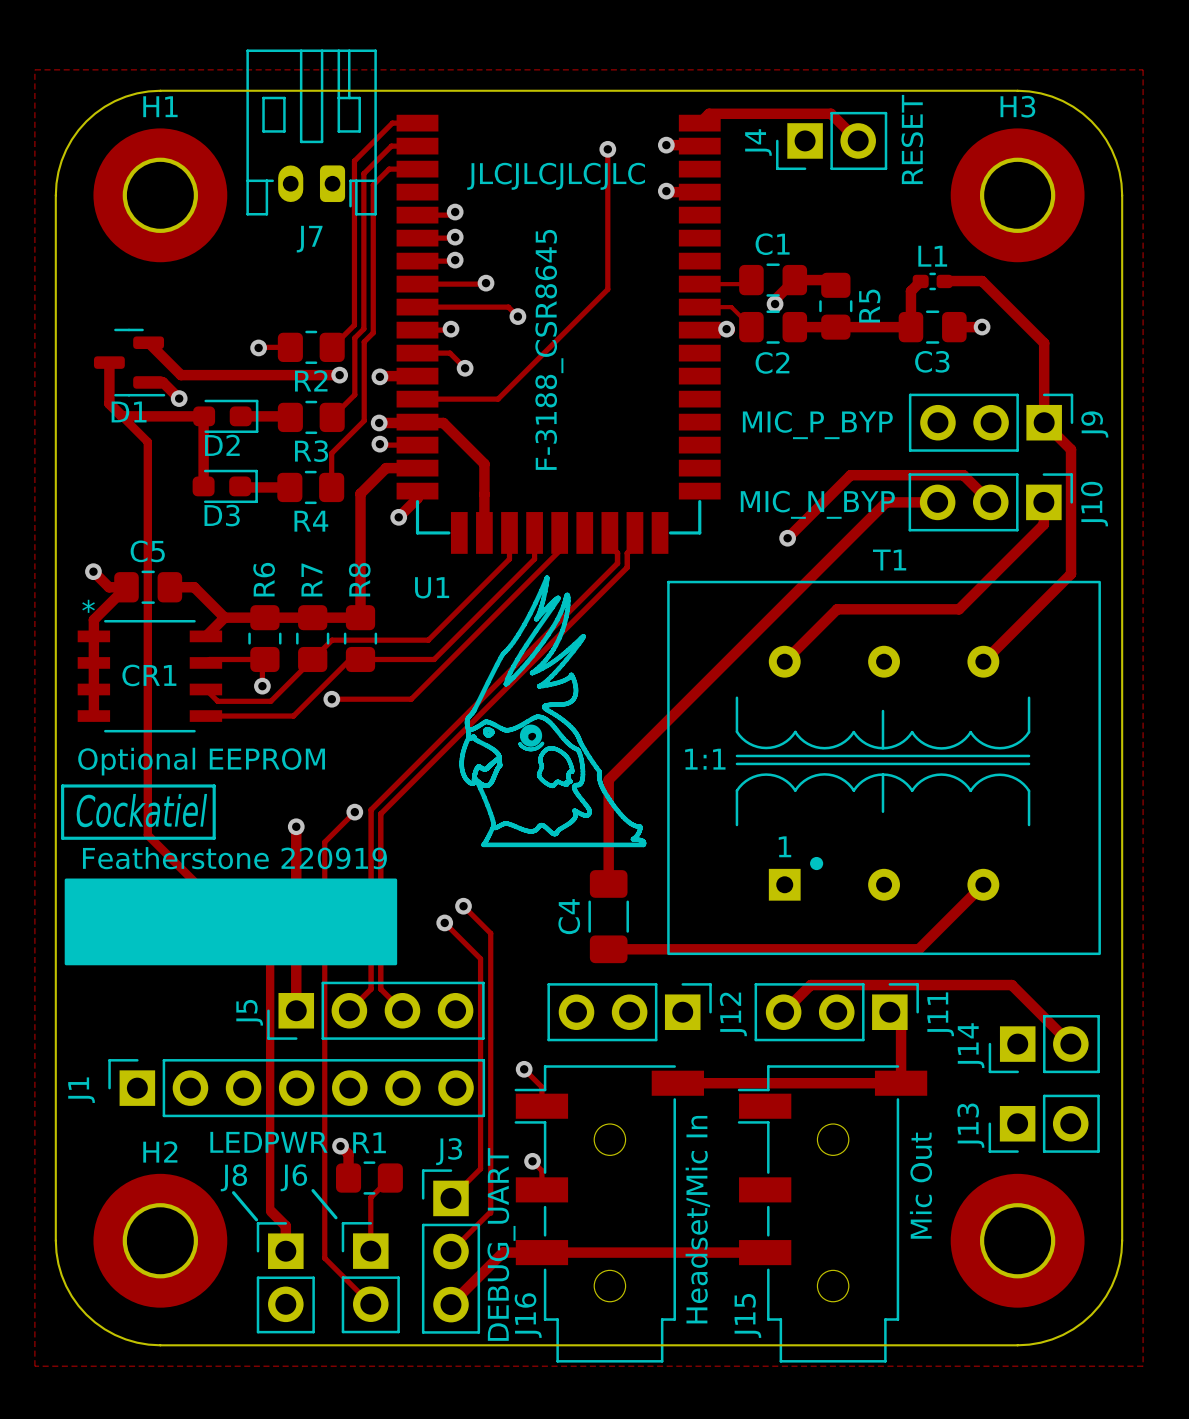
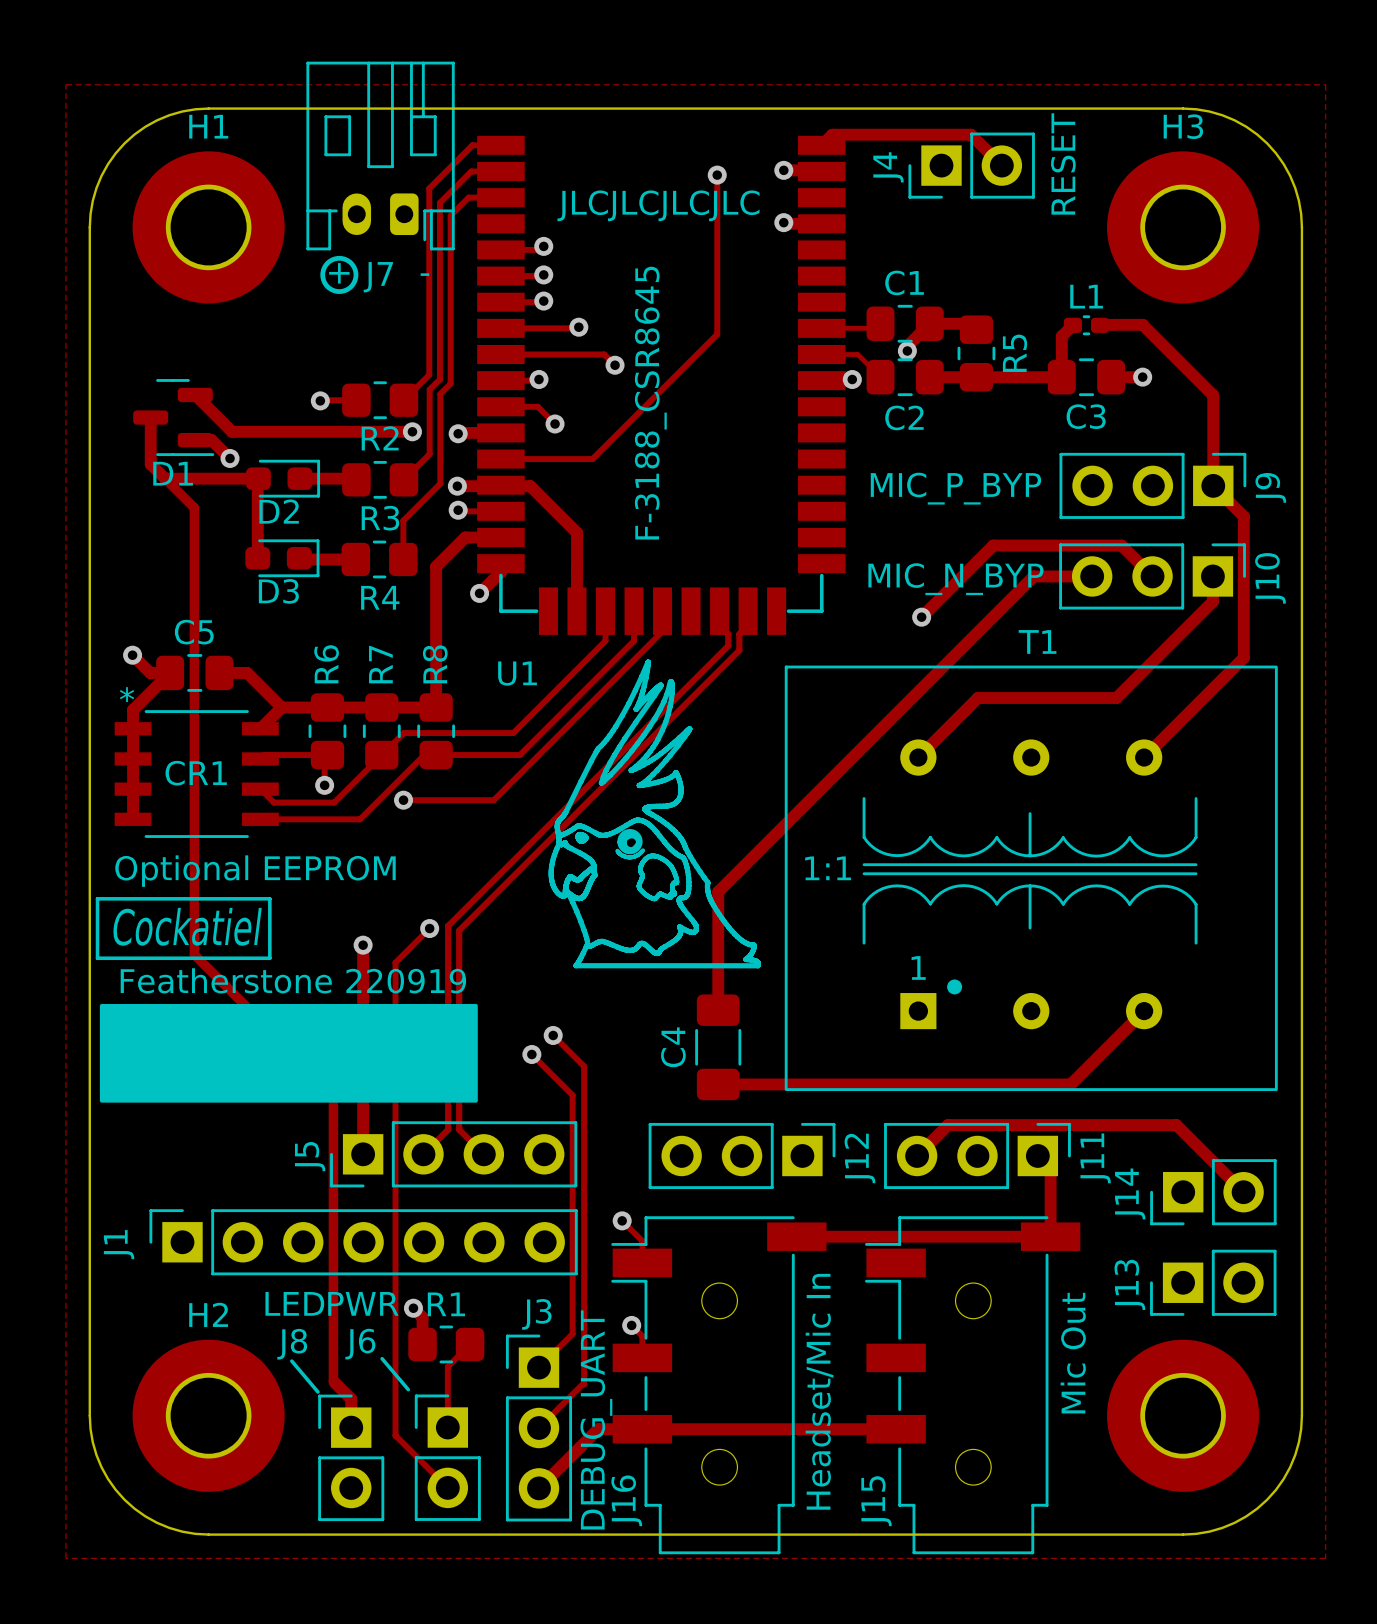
drawing: none -> [320, 255, 359, 294]
text: none -> + (339, 273)
text: none -> - (424, 274)

